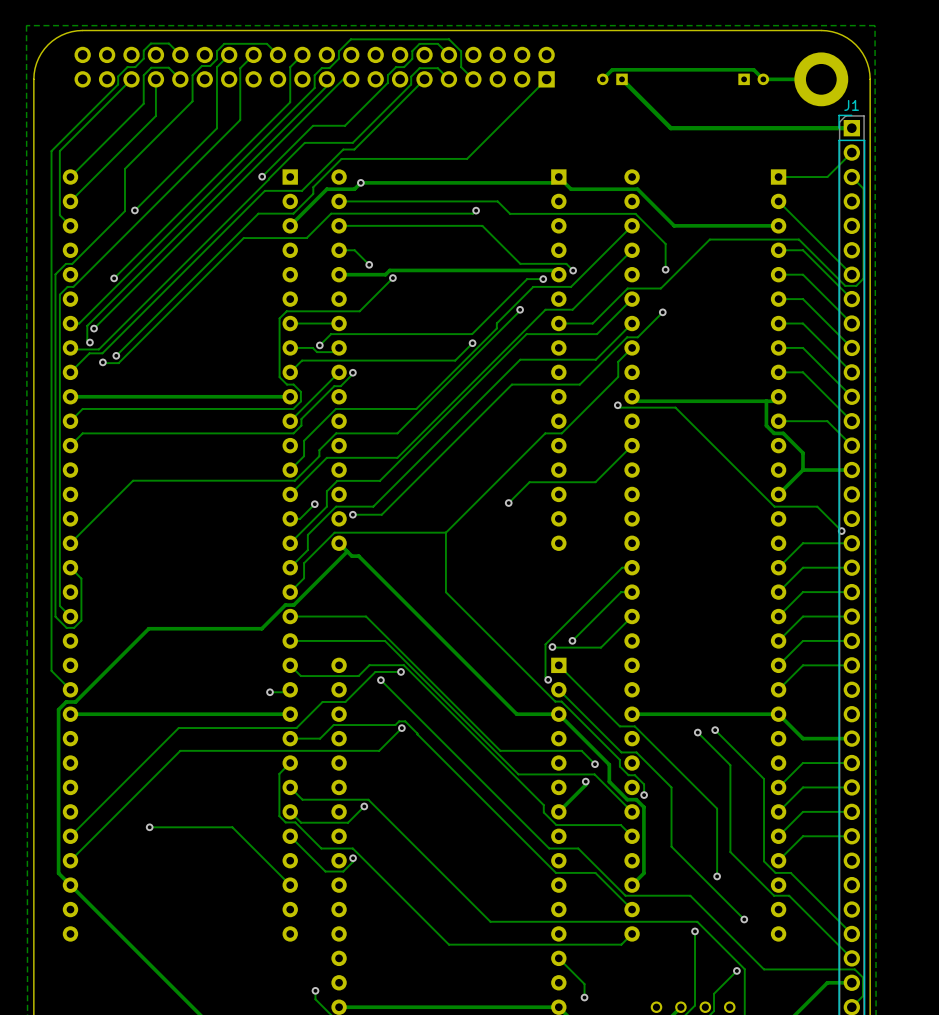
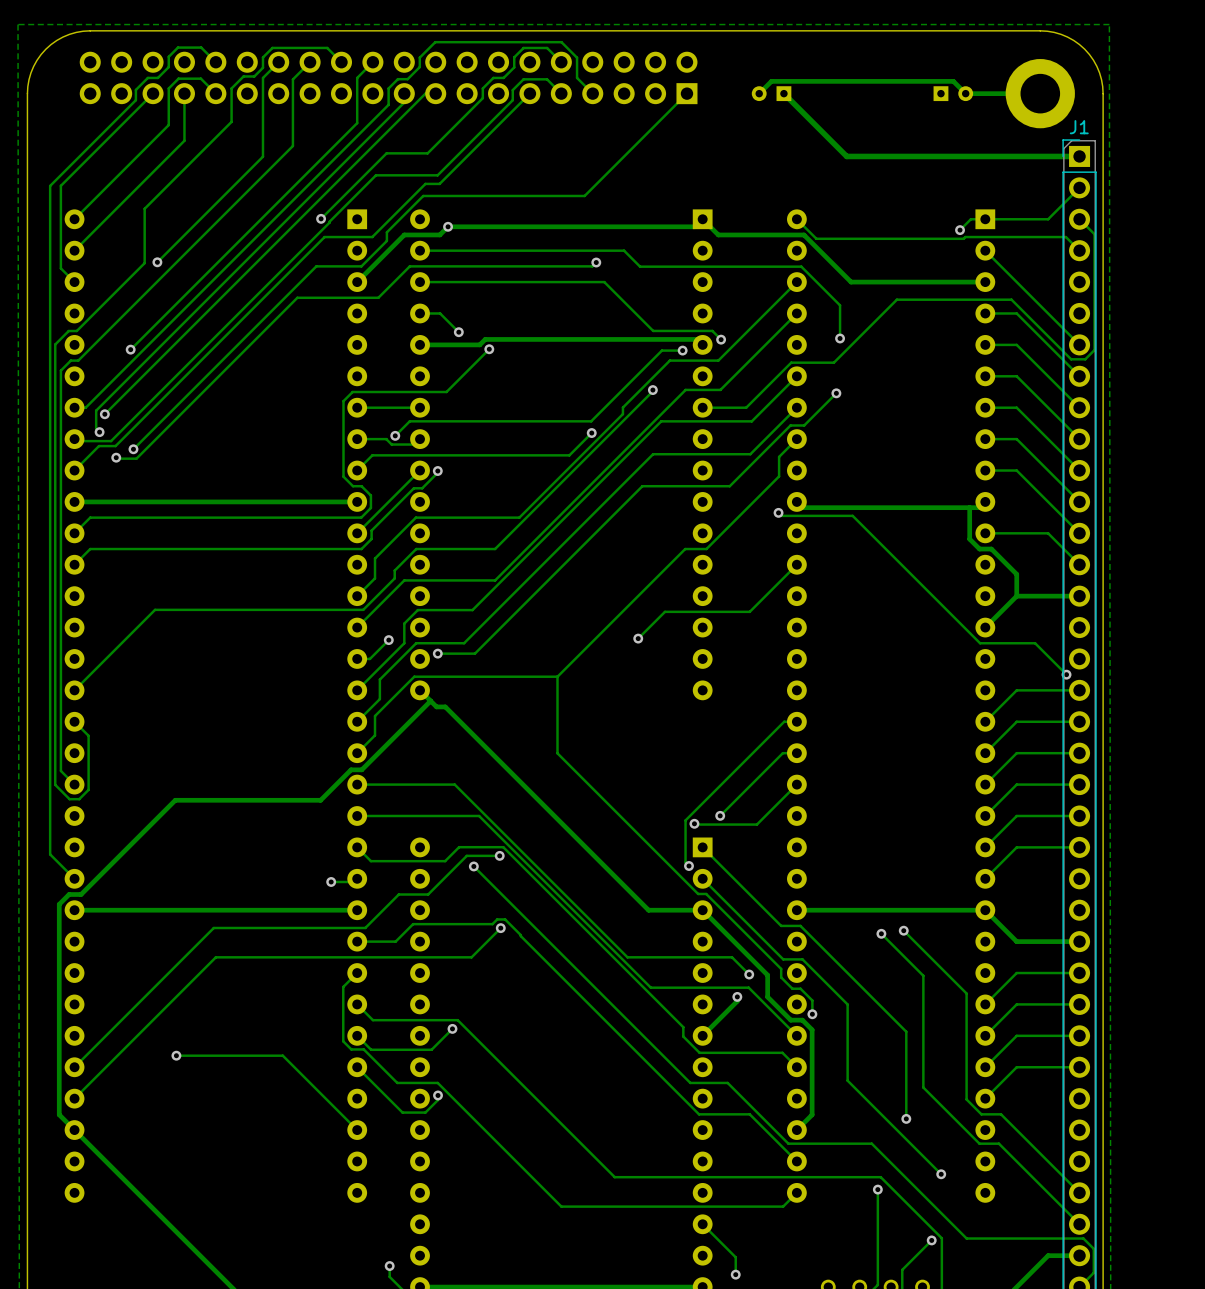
track: none -> (796, 219) (816, 238) (1065, 237) (1079, 250)
track: none -> (985, 219) (970, 219) (960, 230)
via: none -> (960, 230)

